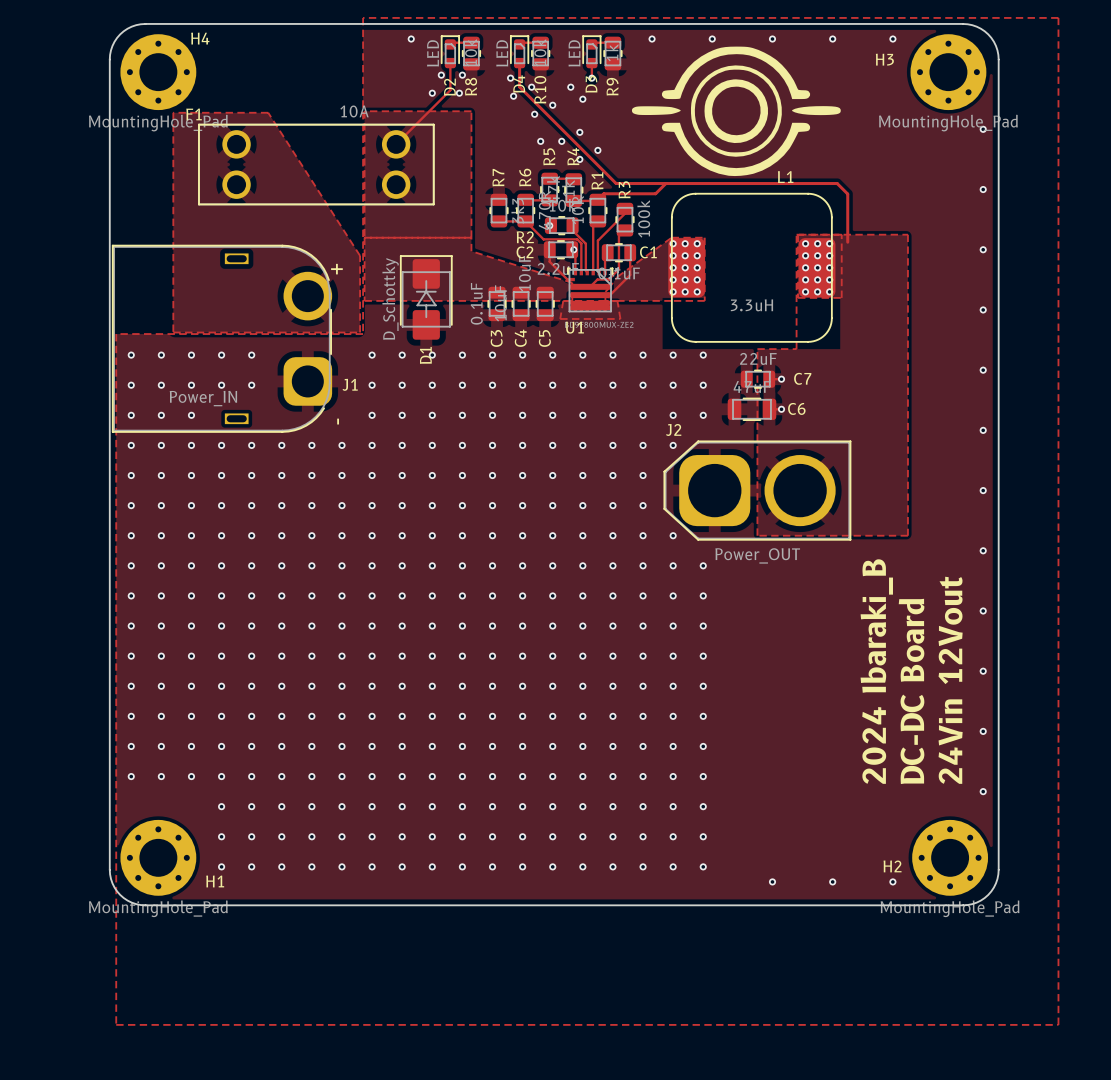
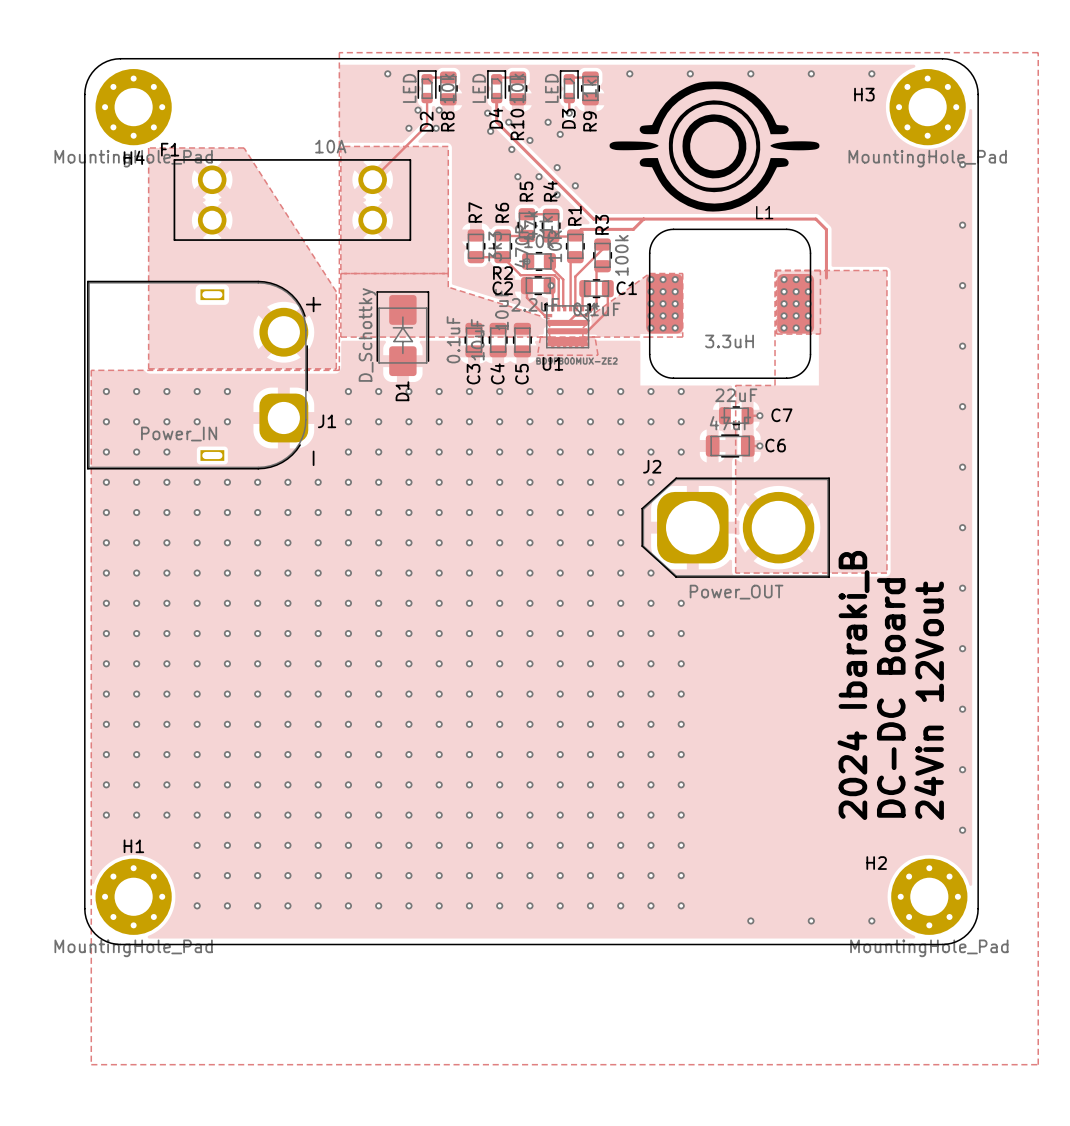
H4 name position: H4 (200, 38) -> H4 (134, 157)
H2 name position: H2 (892, 866) -> H2 (876, 863)
H1 name position: H1 (215, 881) -> H1 (133, 846)

